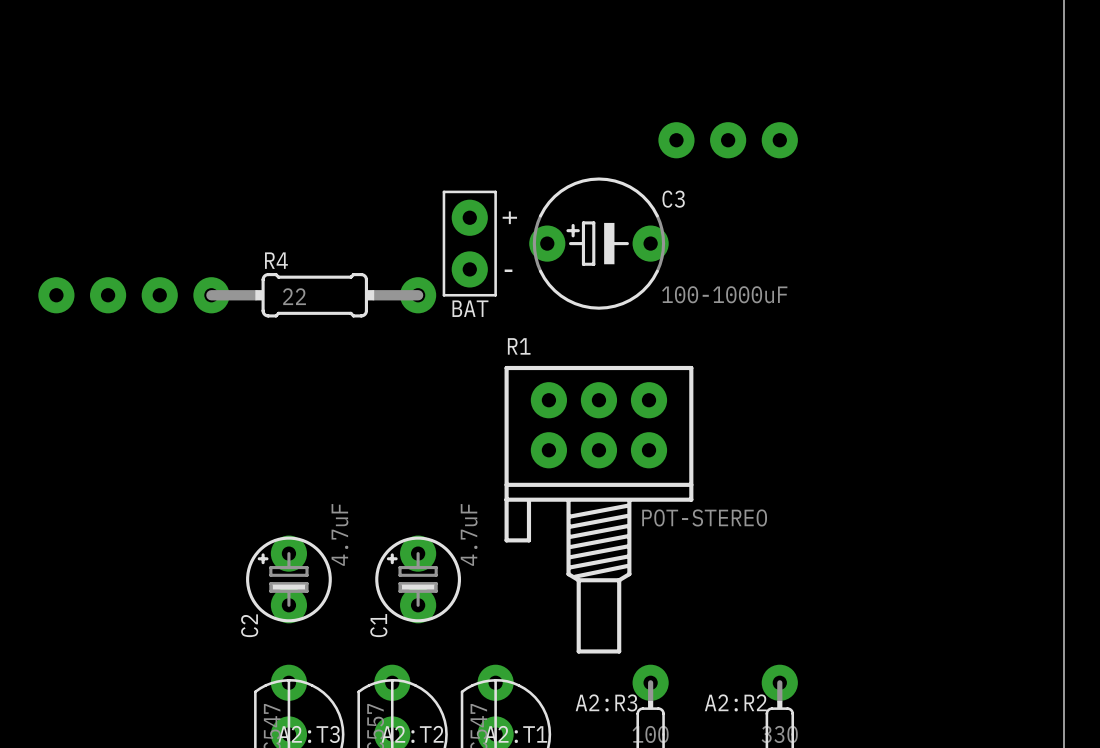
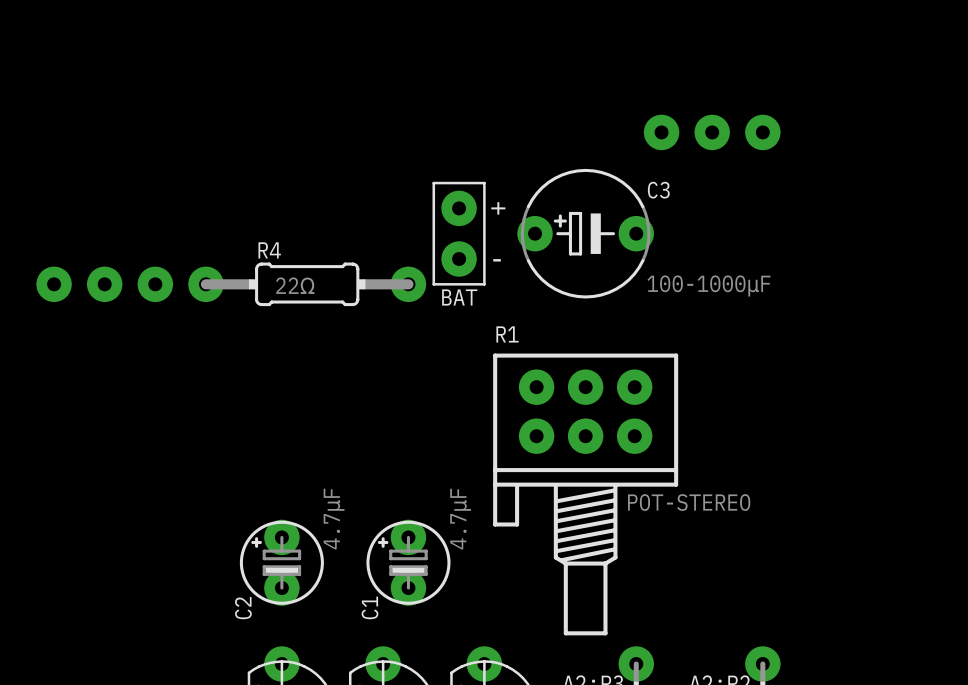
C3 value: 100-1000uF (724, 294) -> 100-1000μF (708, 285)
R4 value: 22 (294, 296) -> 22Ω (295, 285)
C2 value: 4.7uF (339, 534) -> 4.7μF (334, 519)
C1 value: 4.7uF (469, 534) -> 4.7μF (460, 519)

